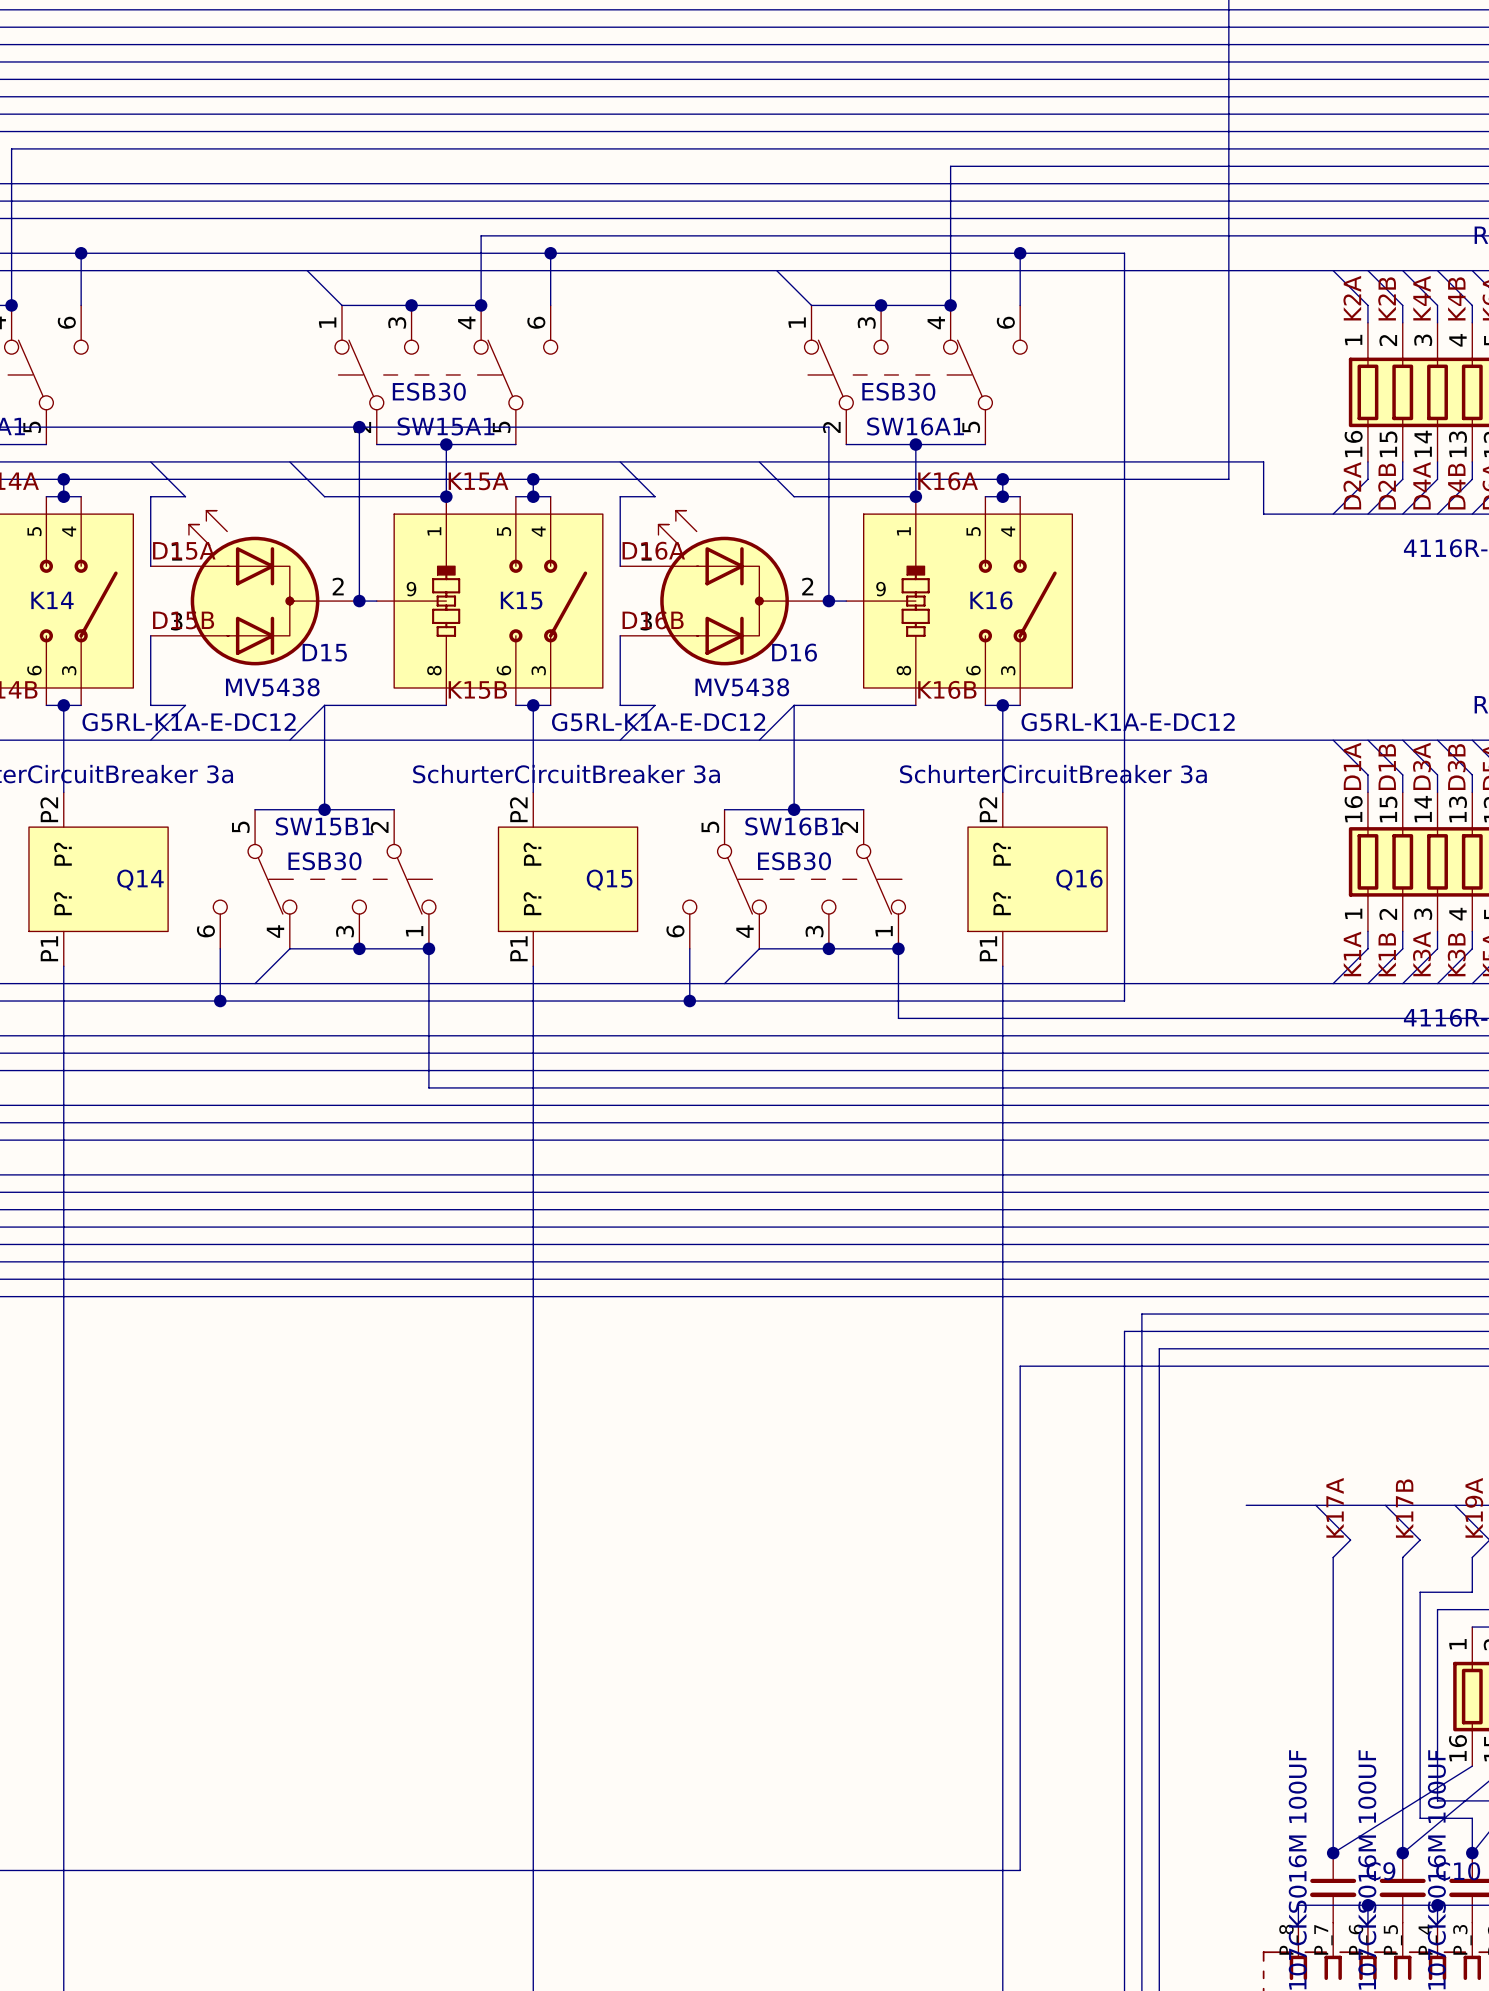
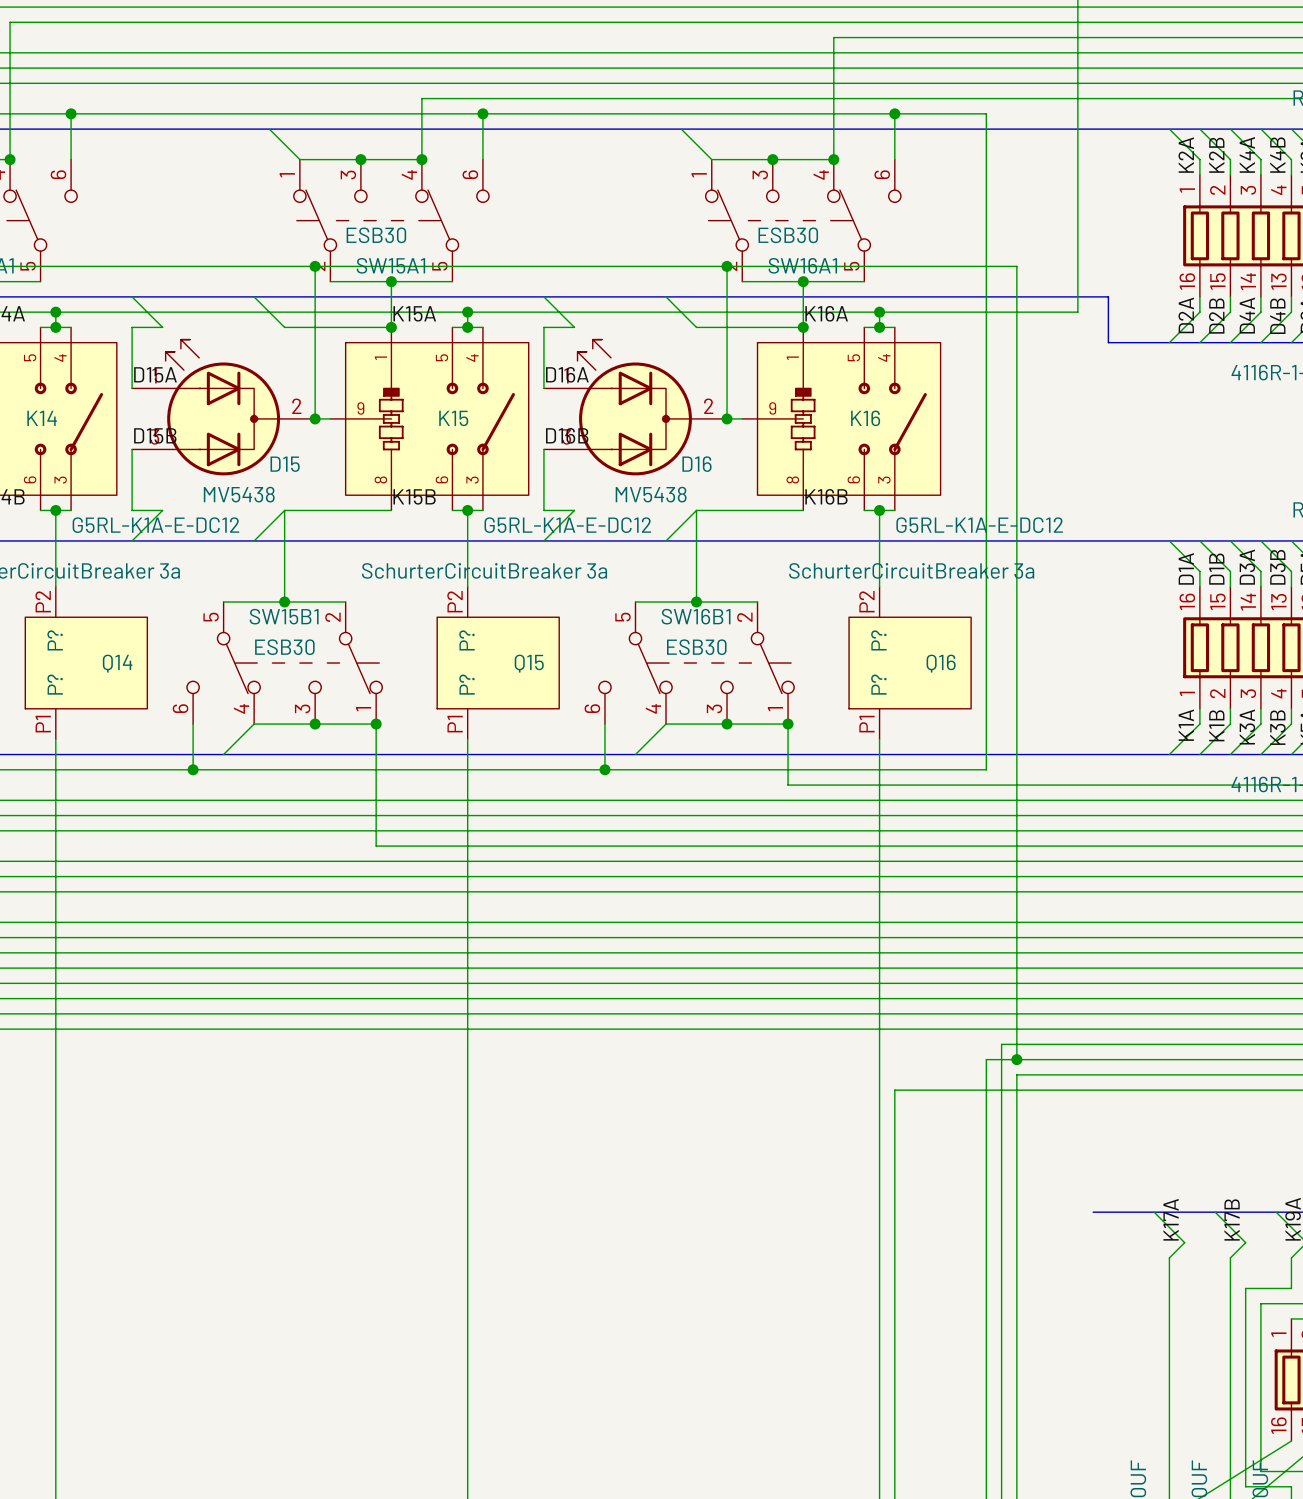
wire: none -> (727, 266) (1016, 266) (1016, 1059)
junction: none -> (727, 266)
junction: none -> (1016, 1059)

